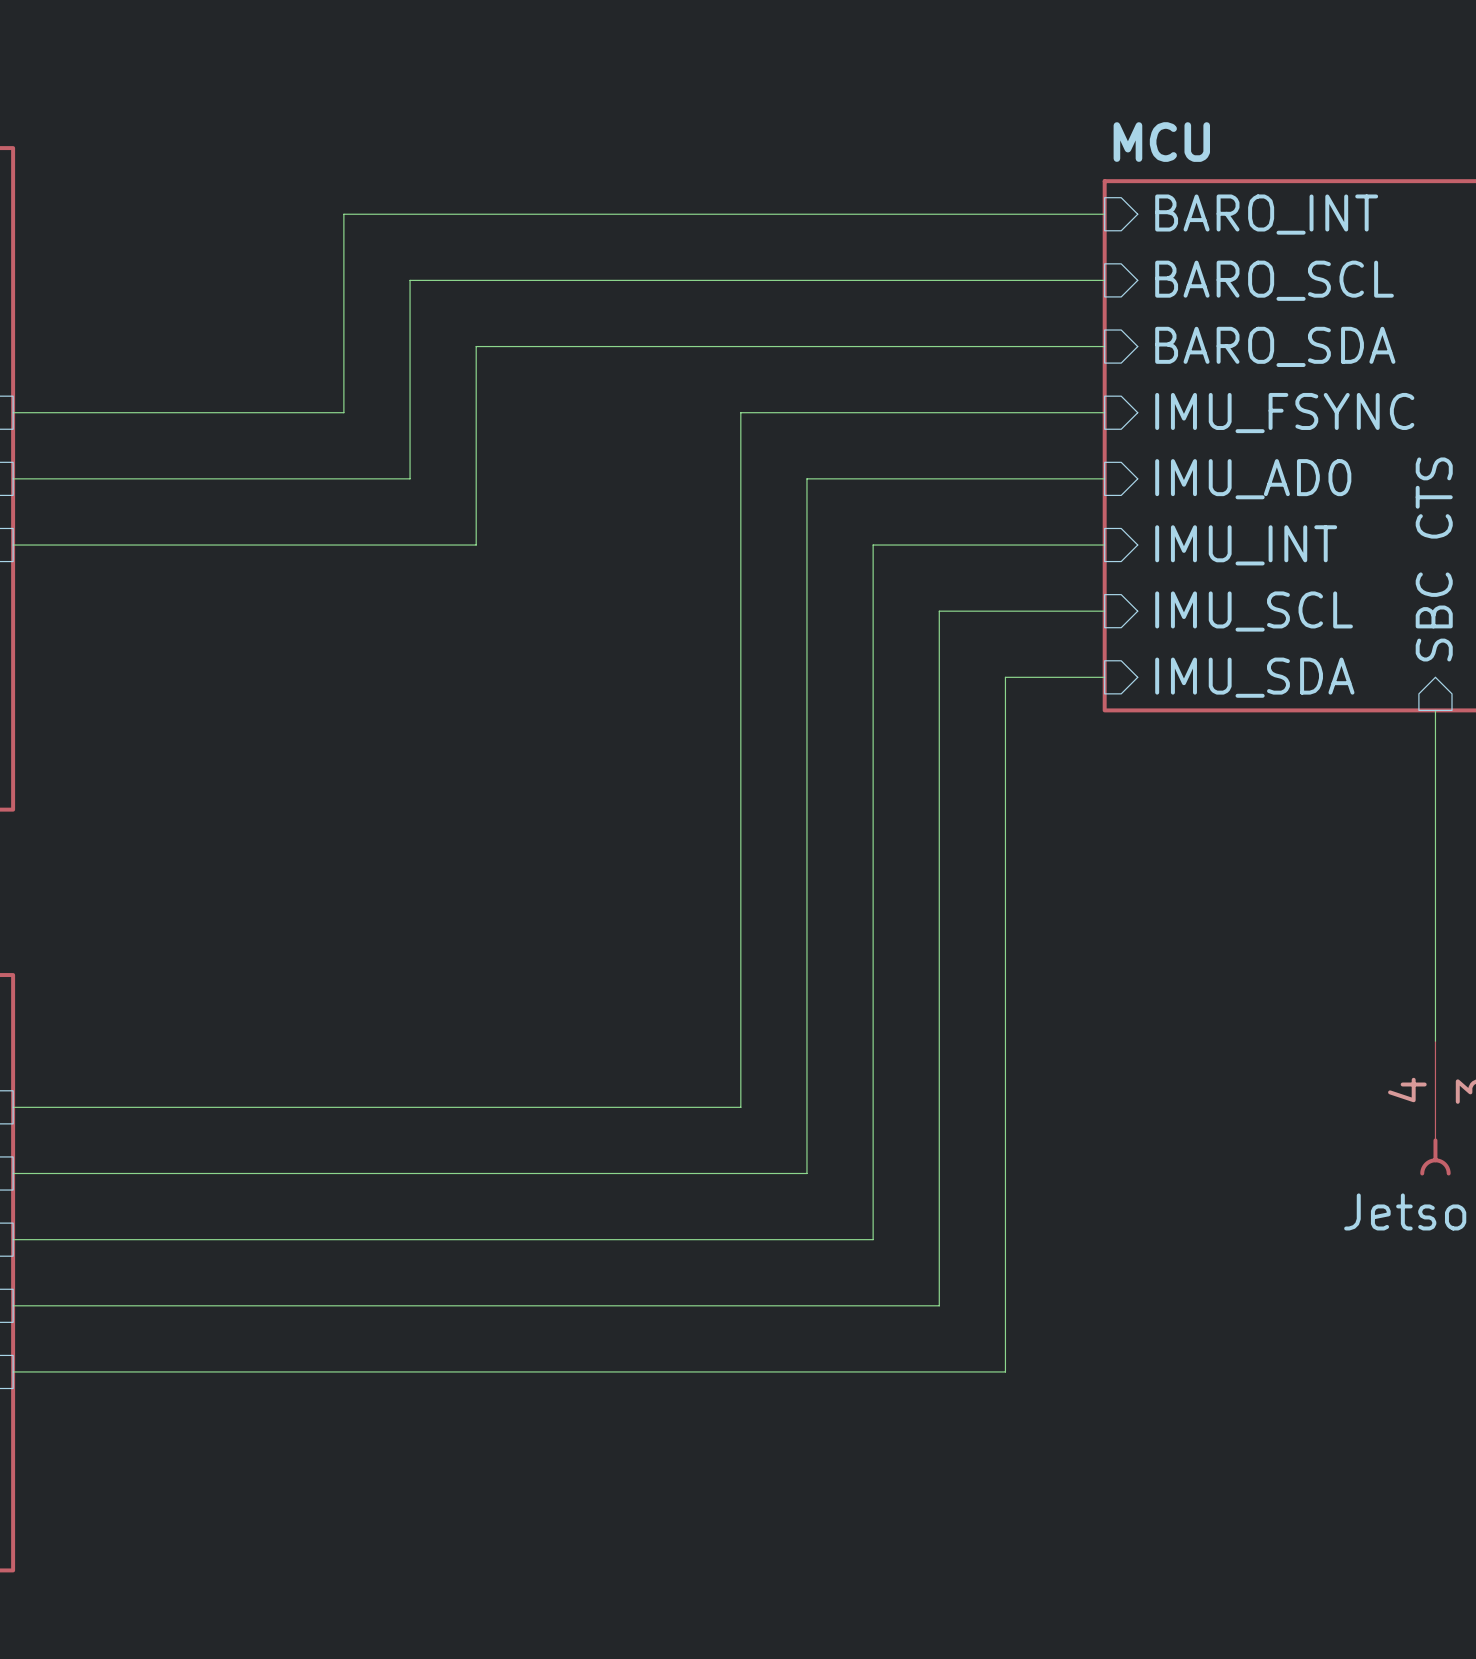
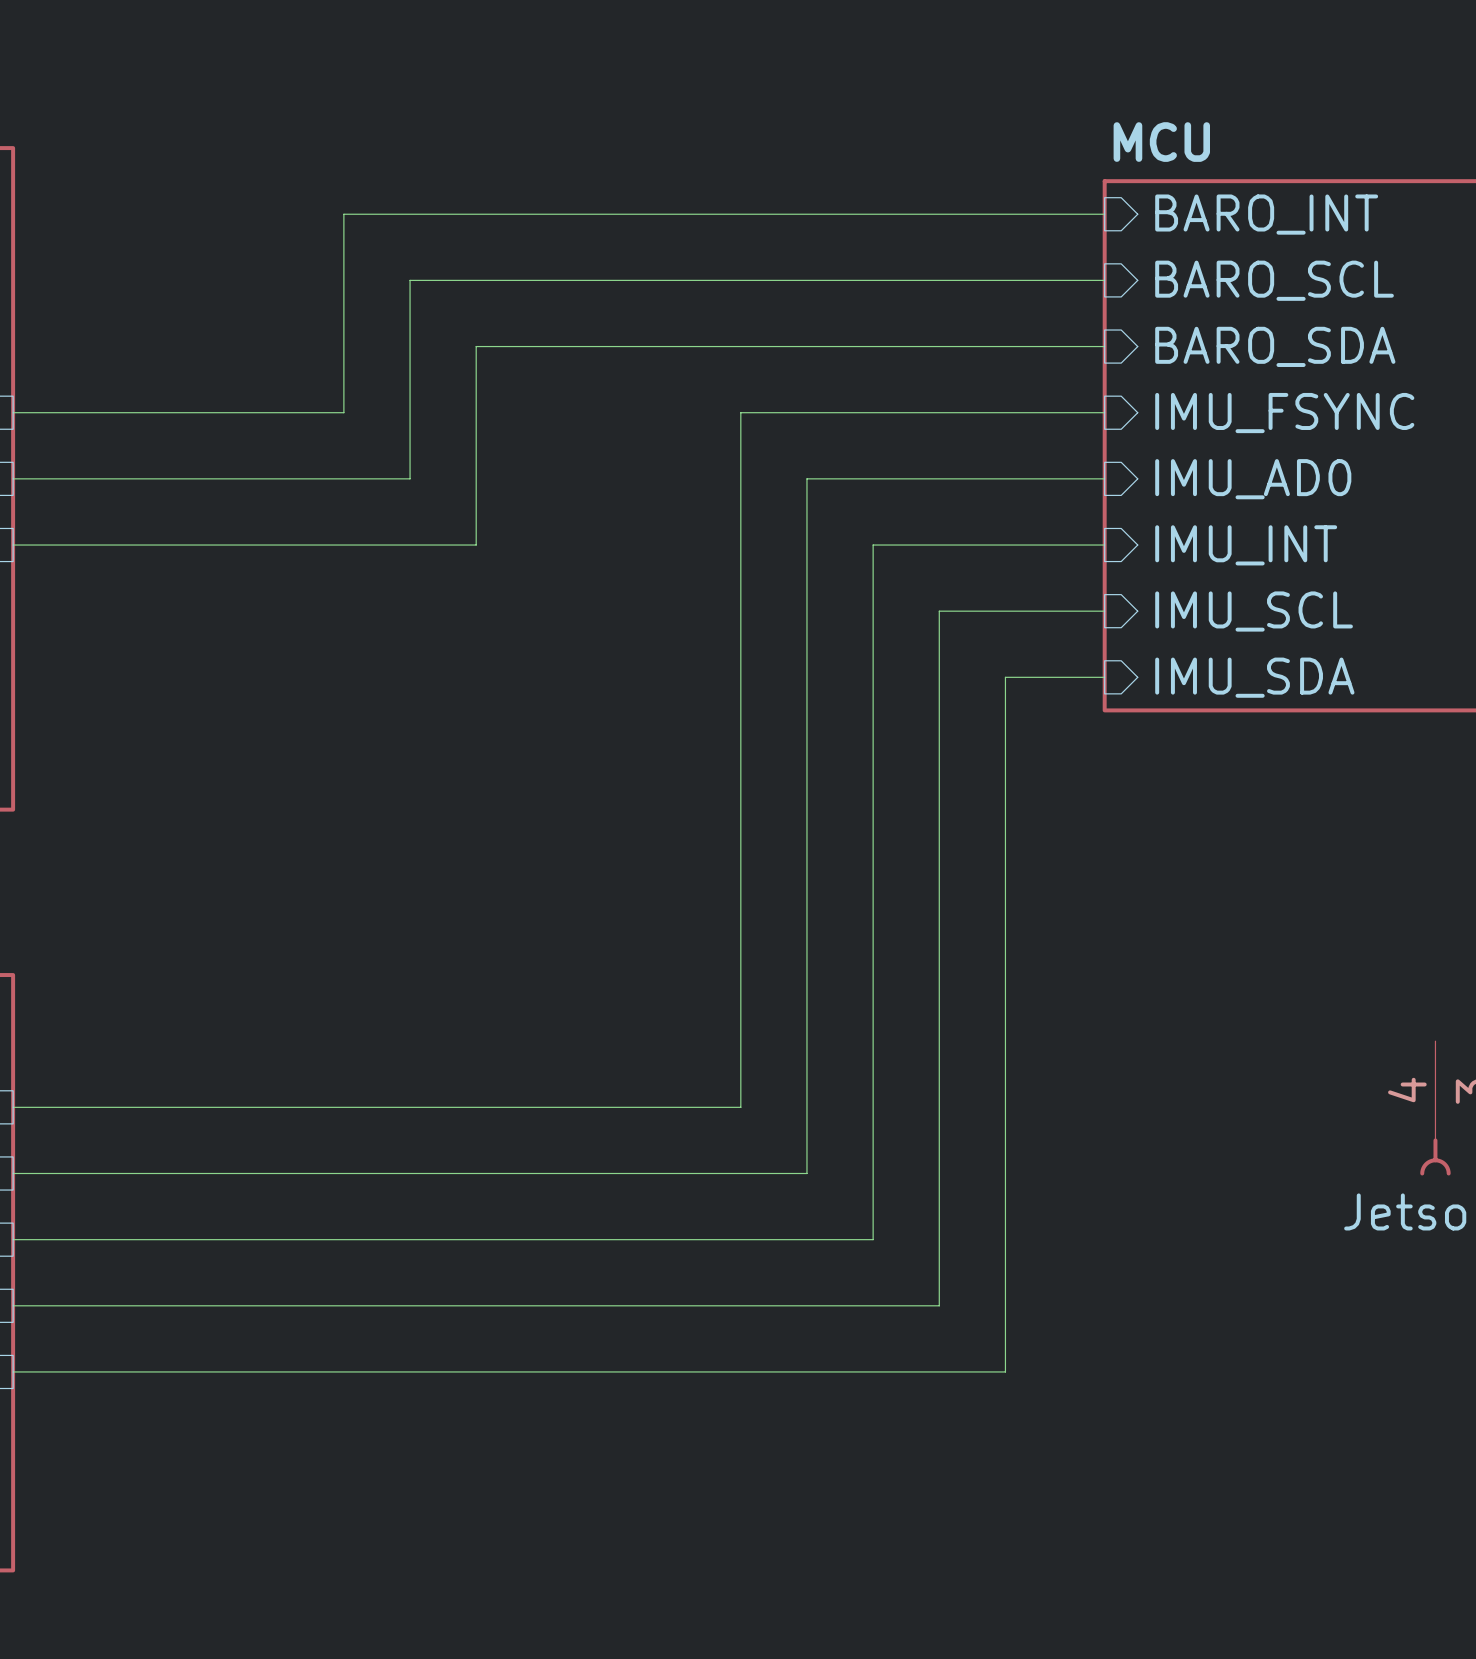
sheet pin: SBC CTS (1434, 559) -> none
wire: (1435, 710) (1435, 1041) -> none

